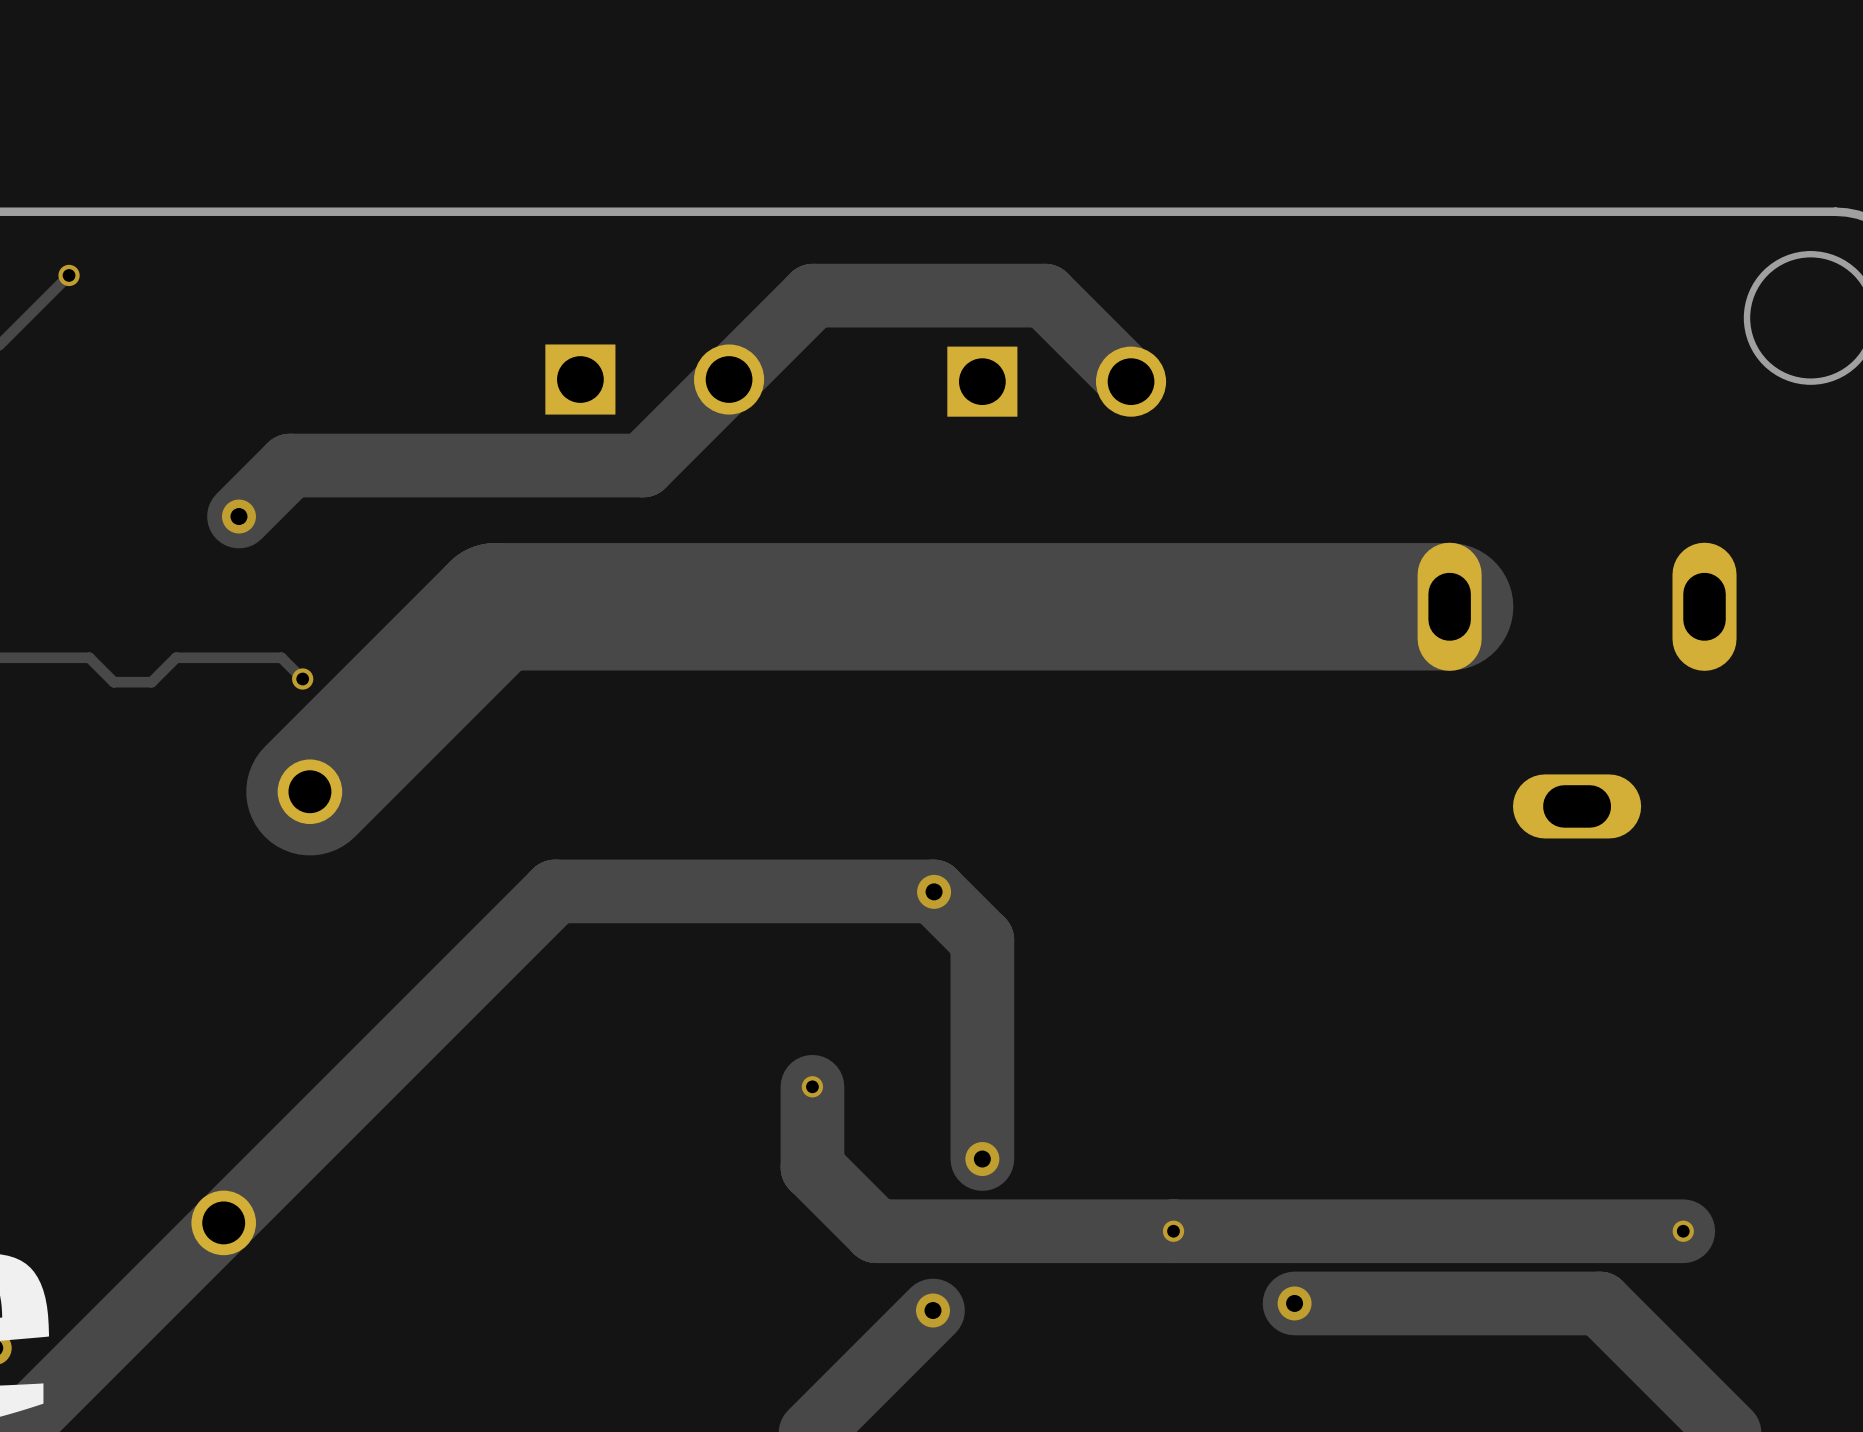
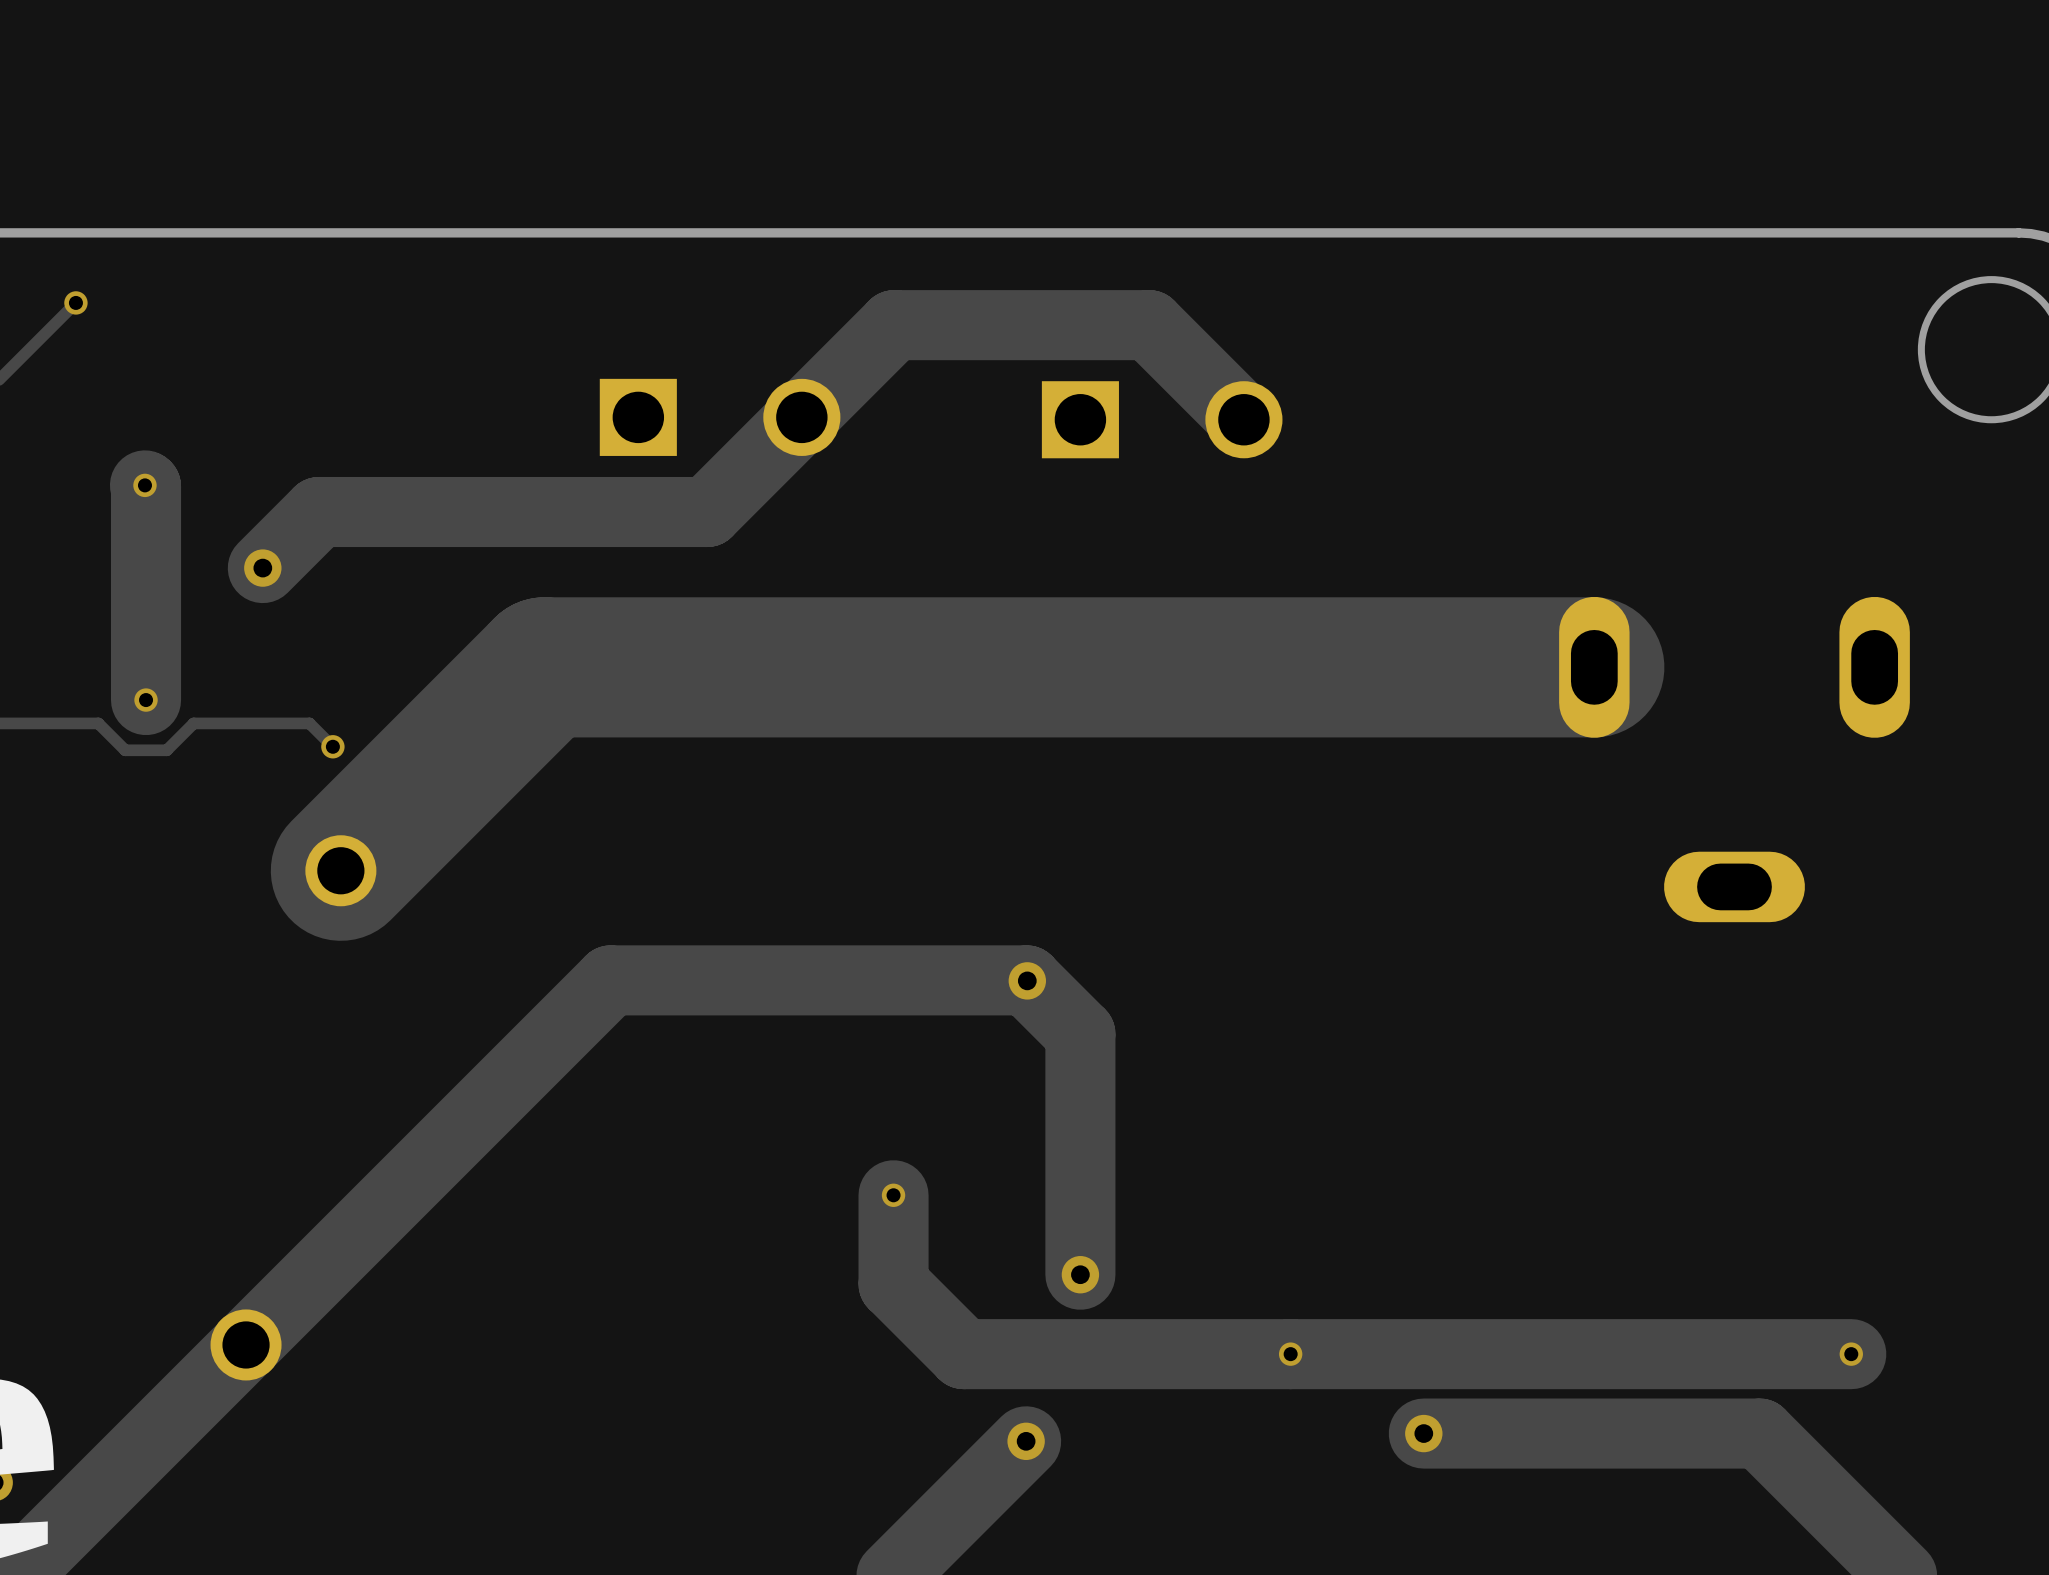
track: none -> (144, 485) (146, 700)
via: none -> (144, 485)
via: none -> (146, 700)

